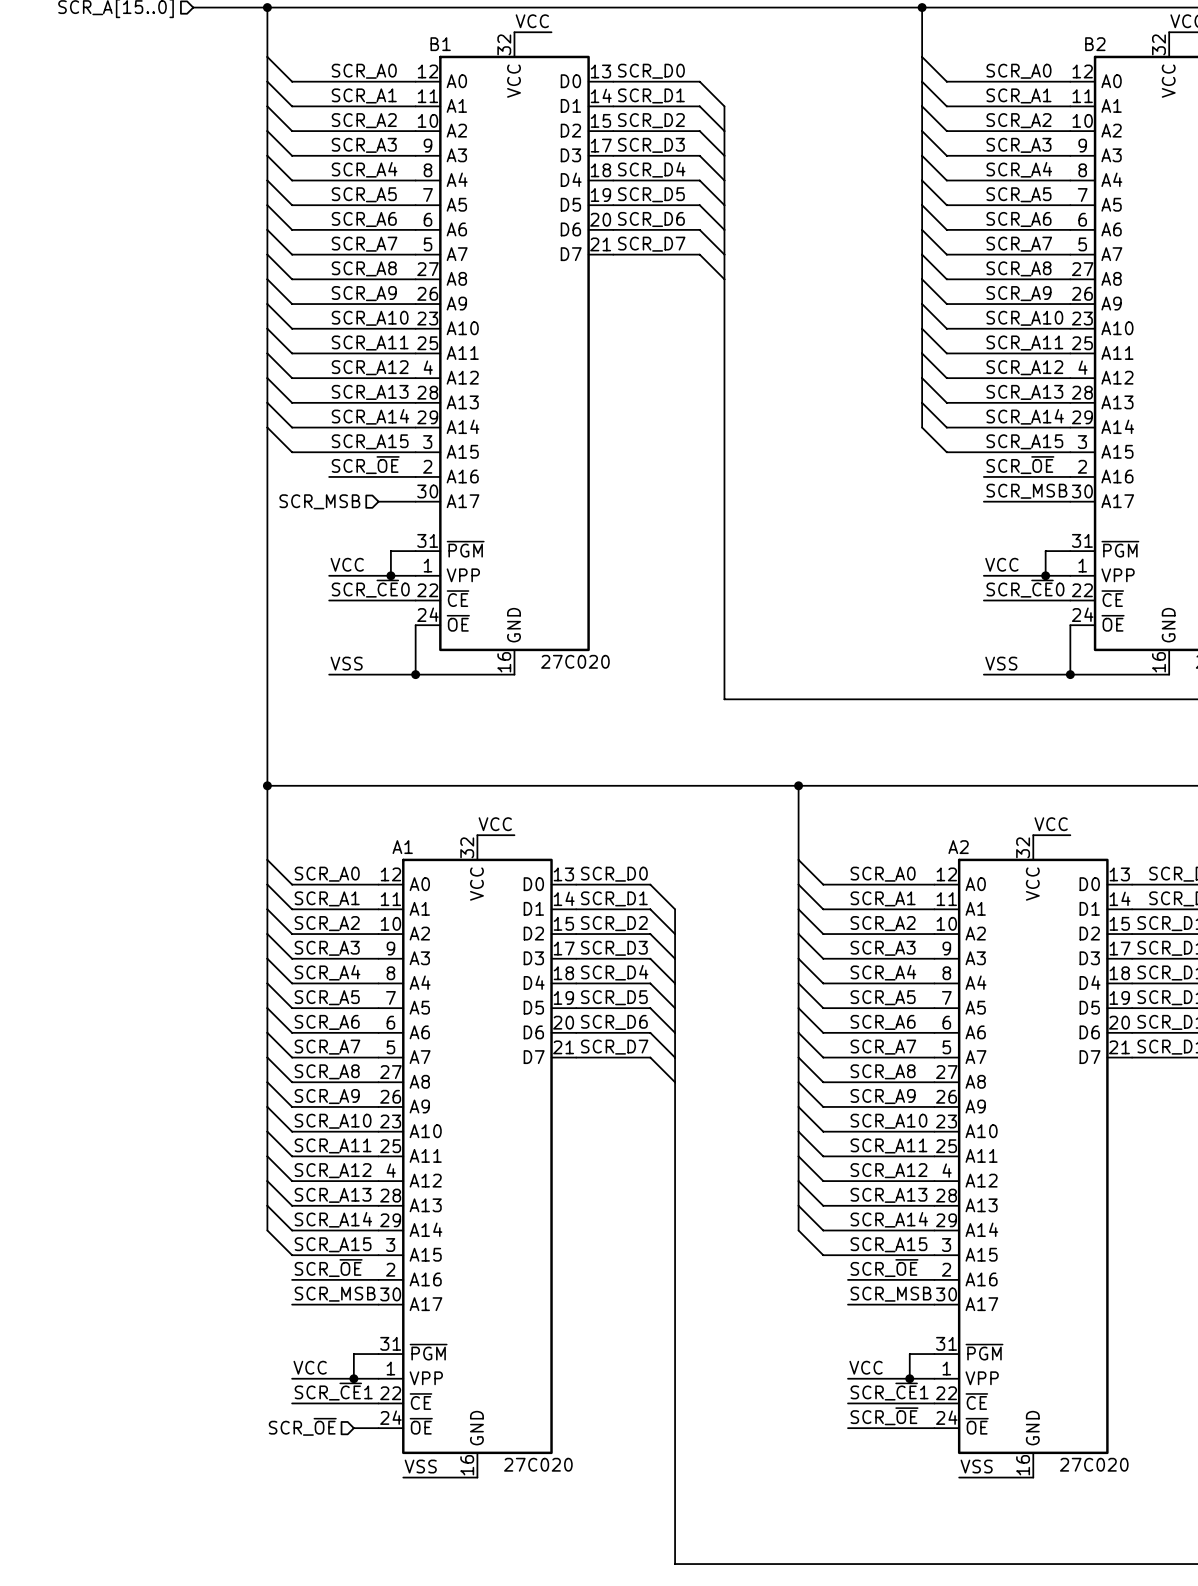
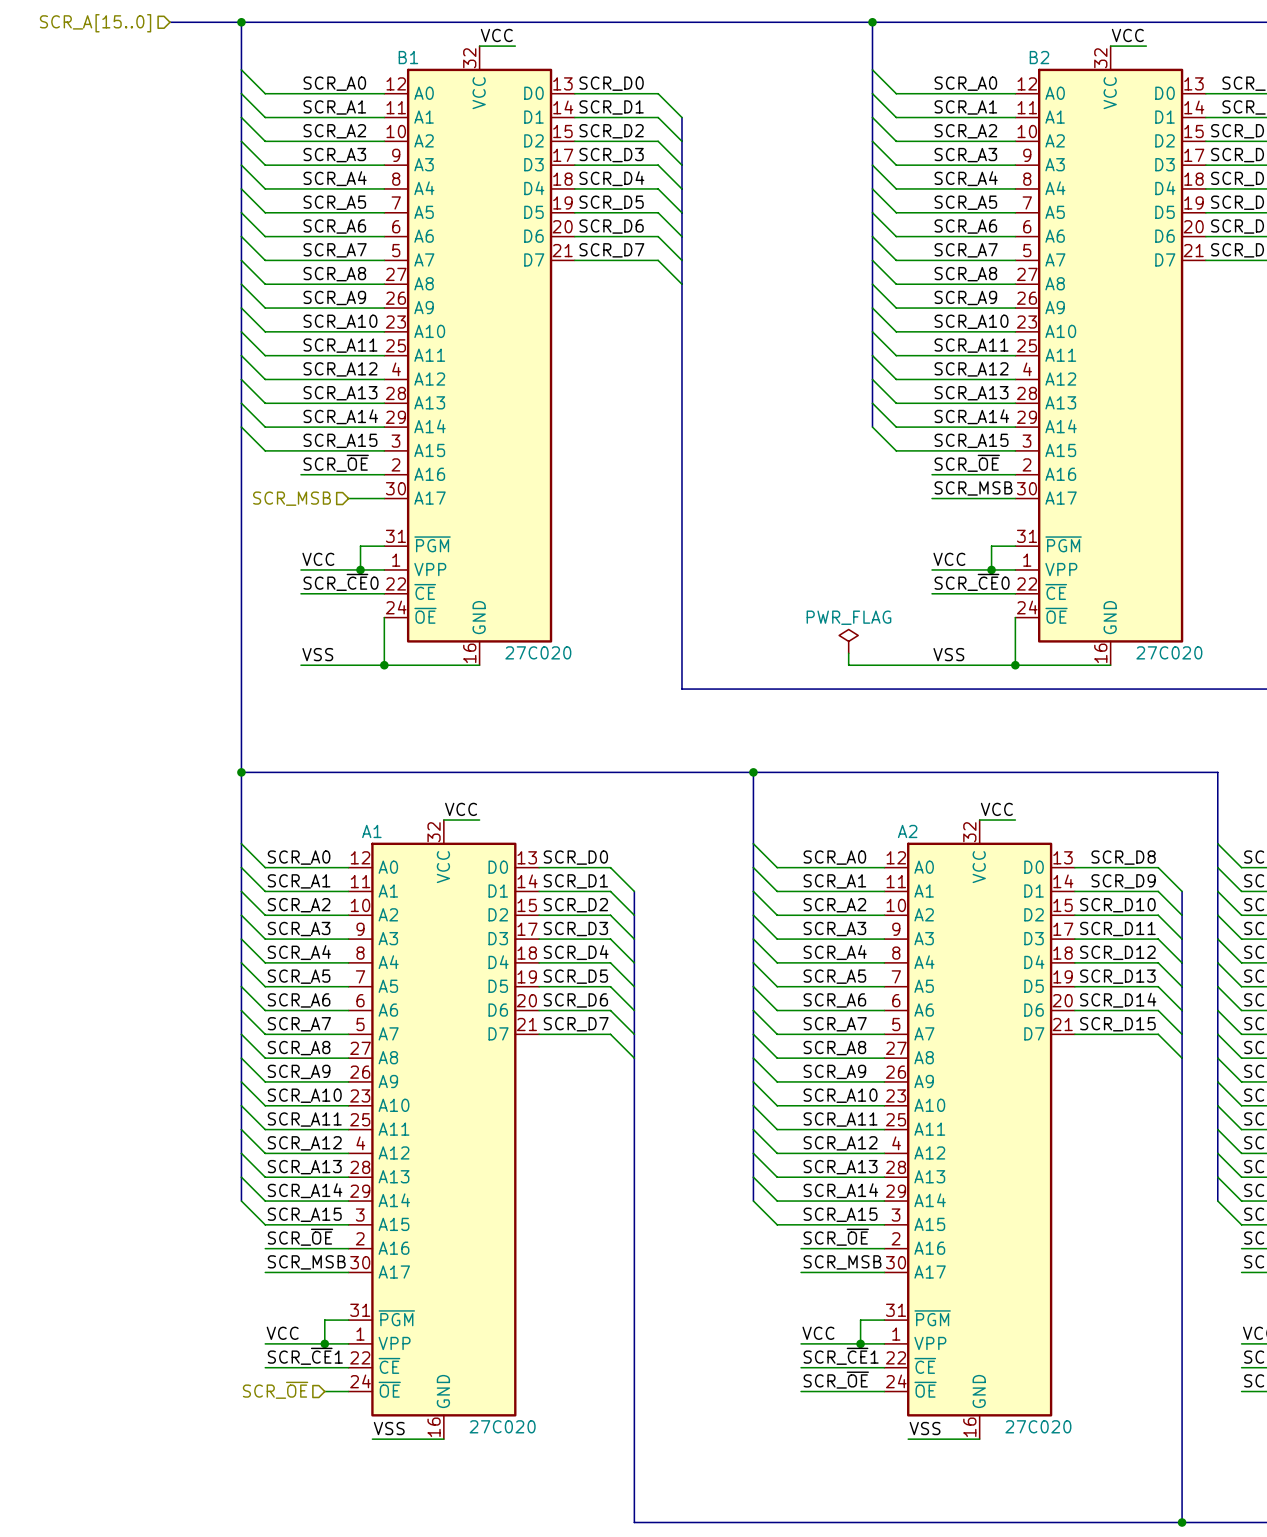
power symbol: none -> PWR_FLAG (848, 641)
wire: none -> (848, 653) (848, 665) (932, 665)

